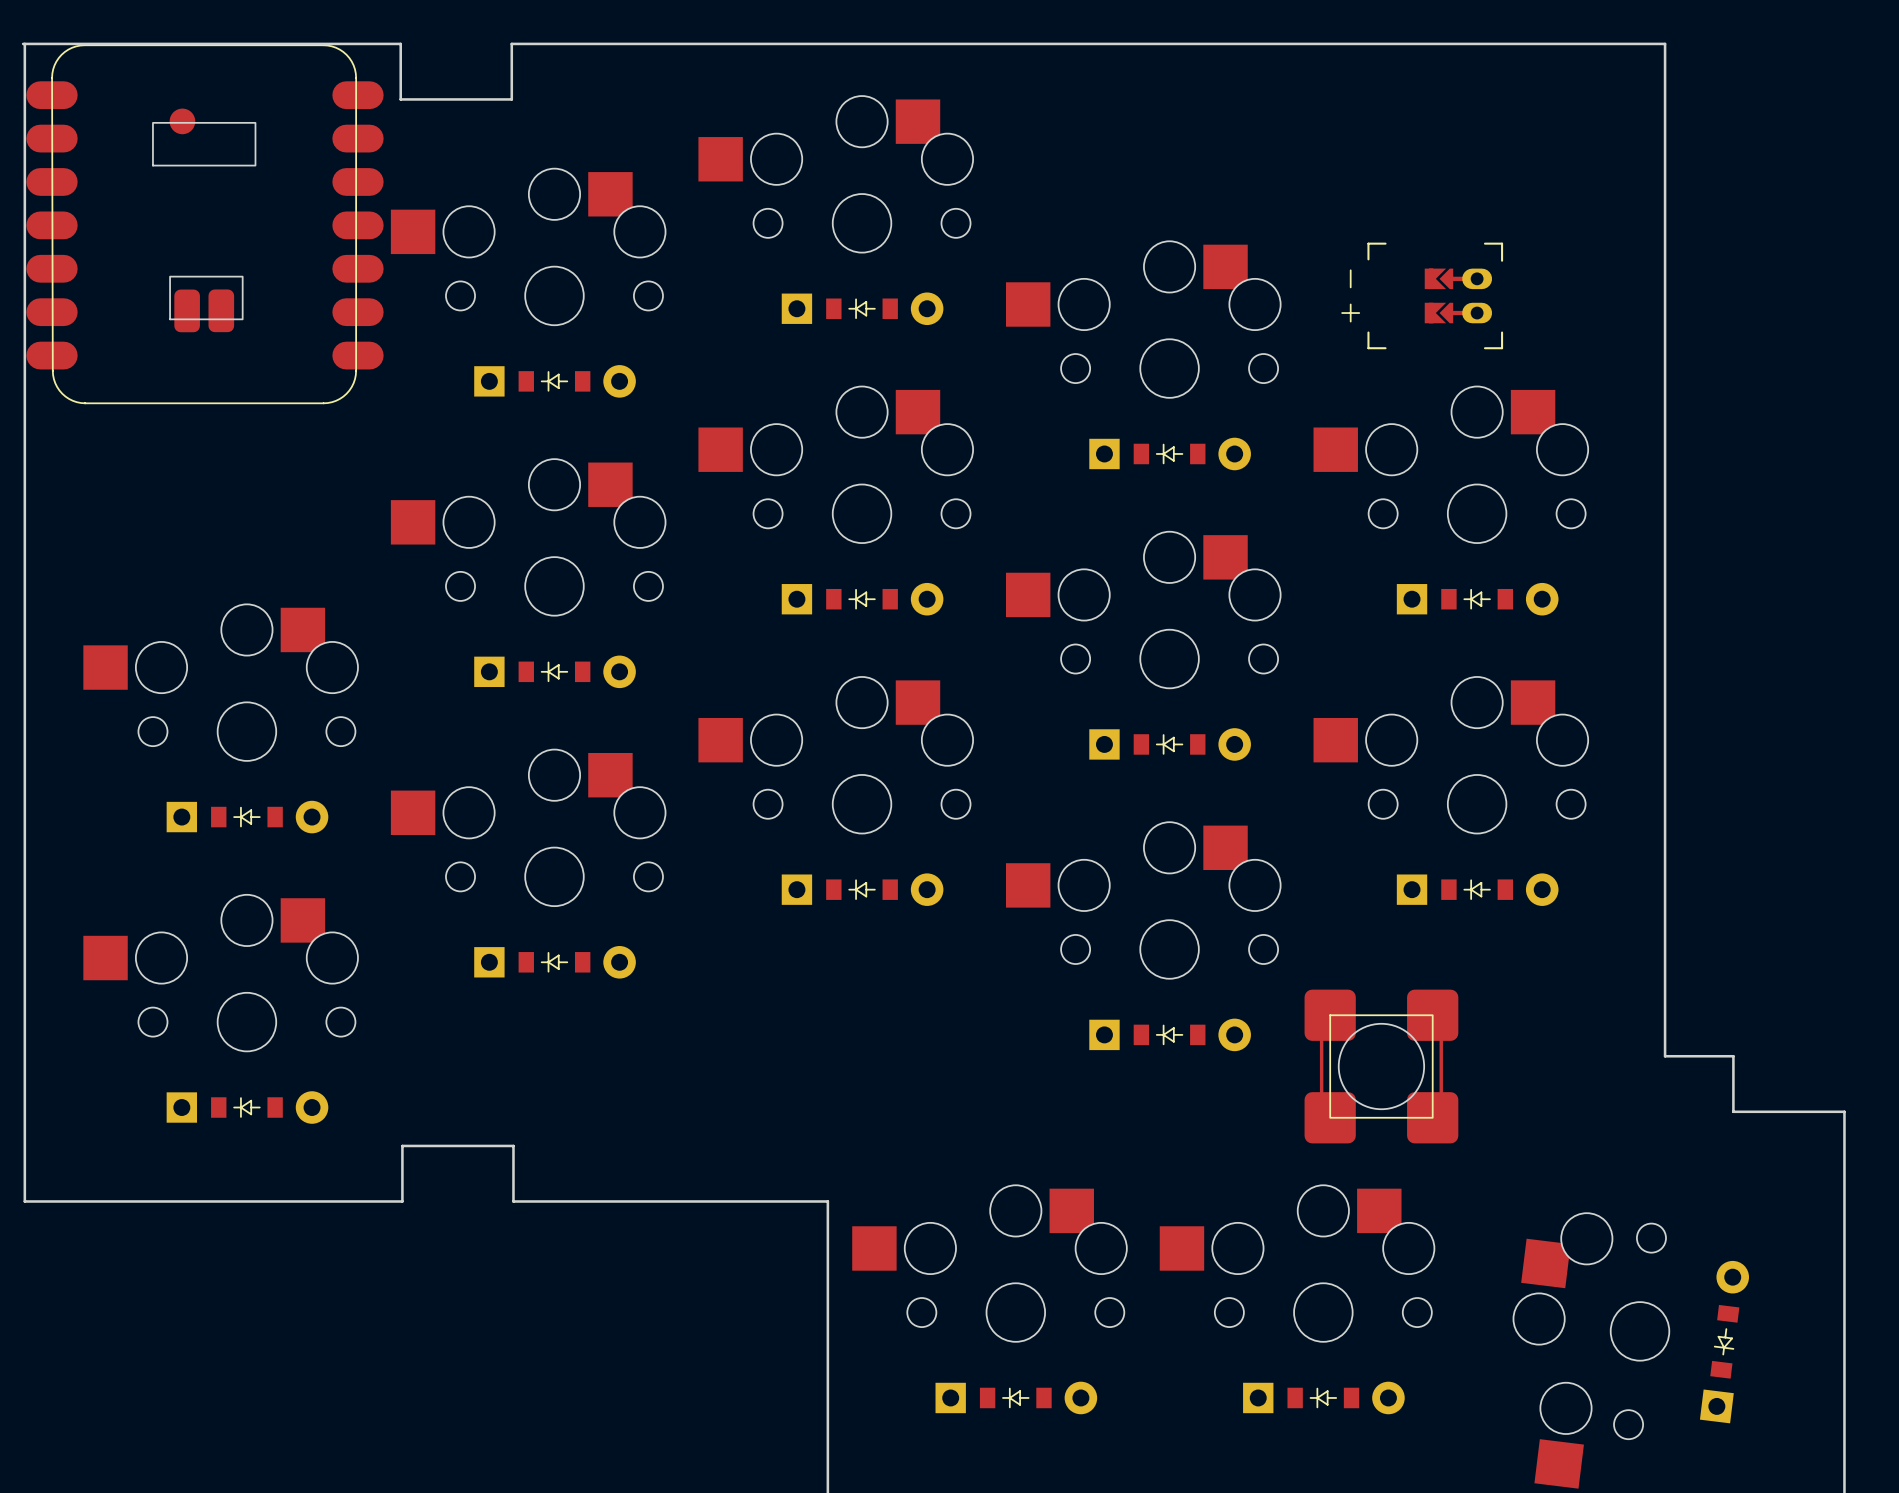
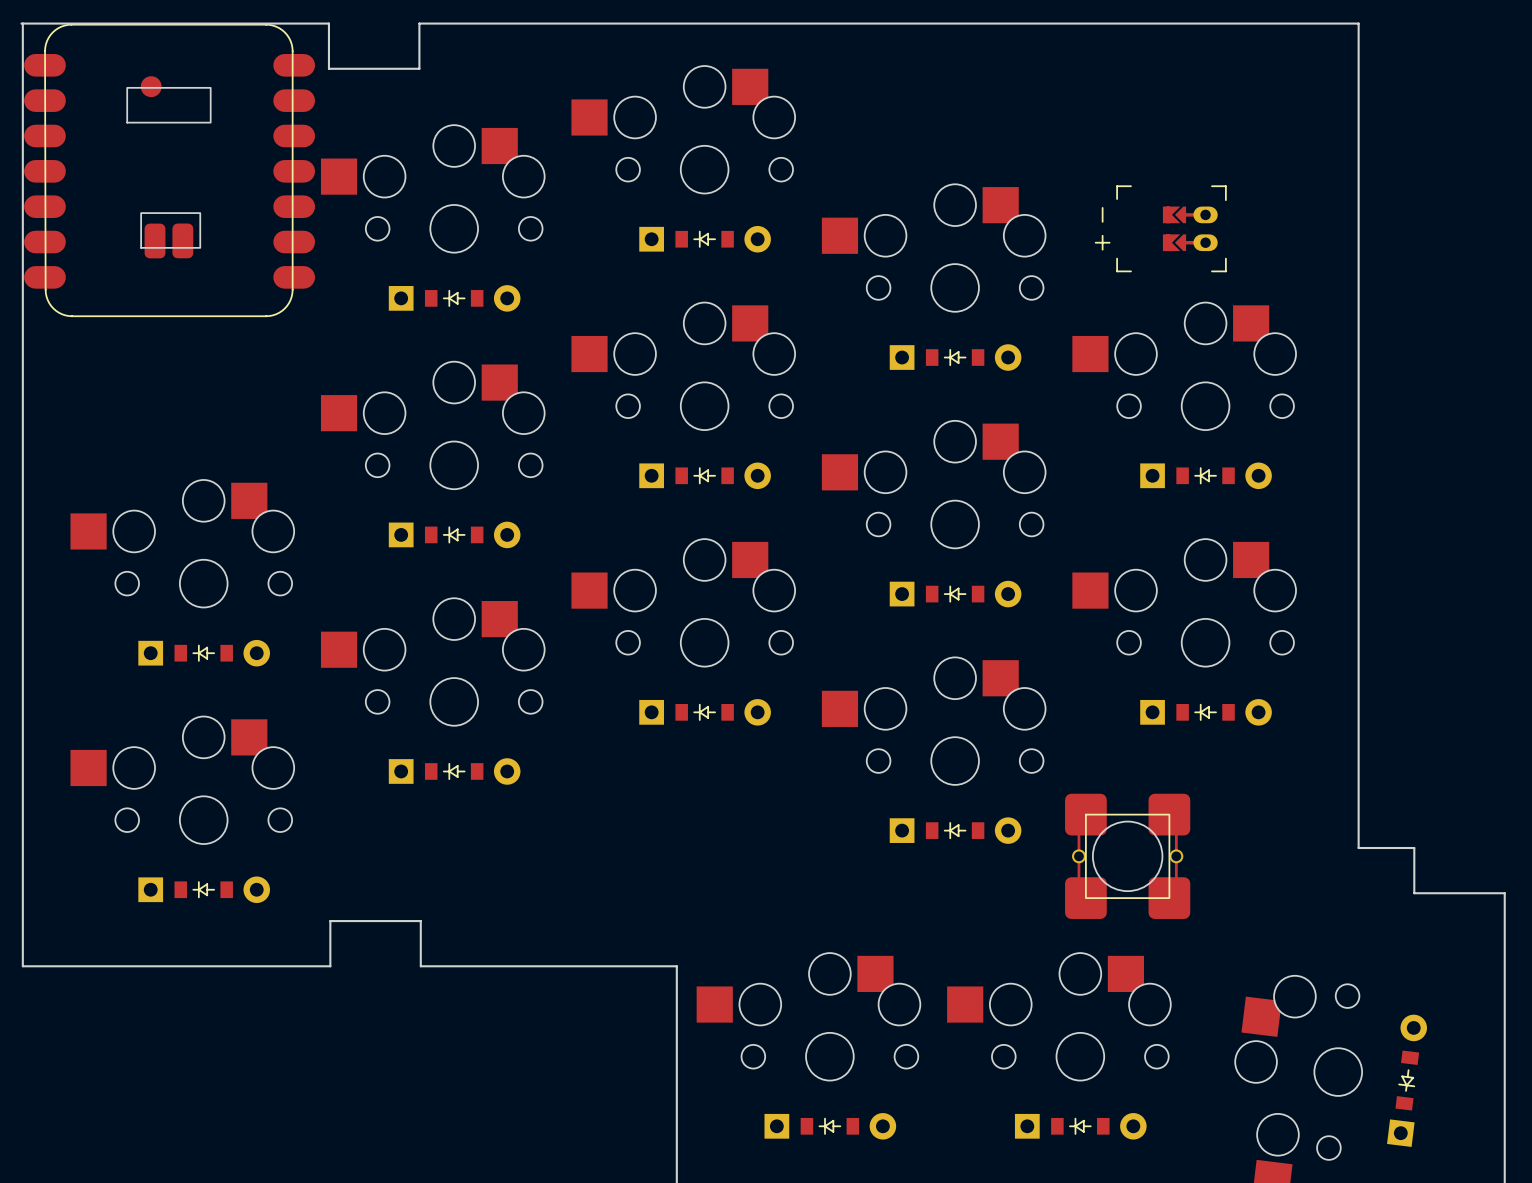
part footprint: [1304, 989, 1459, 1144] -> [1065, 793, 1191, 919]

